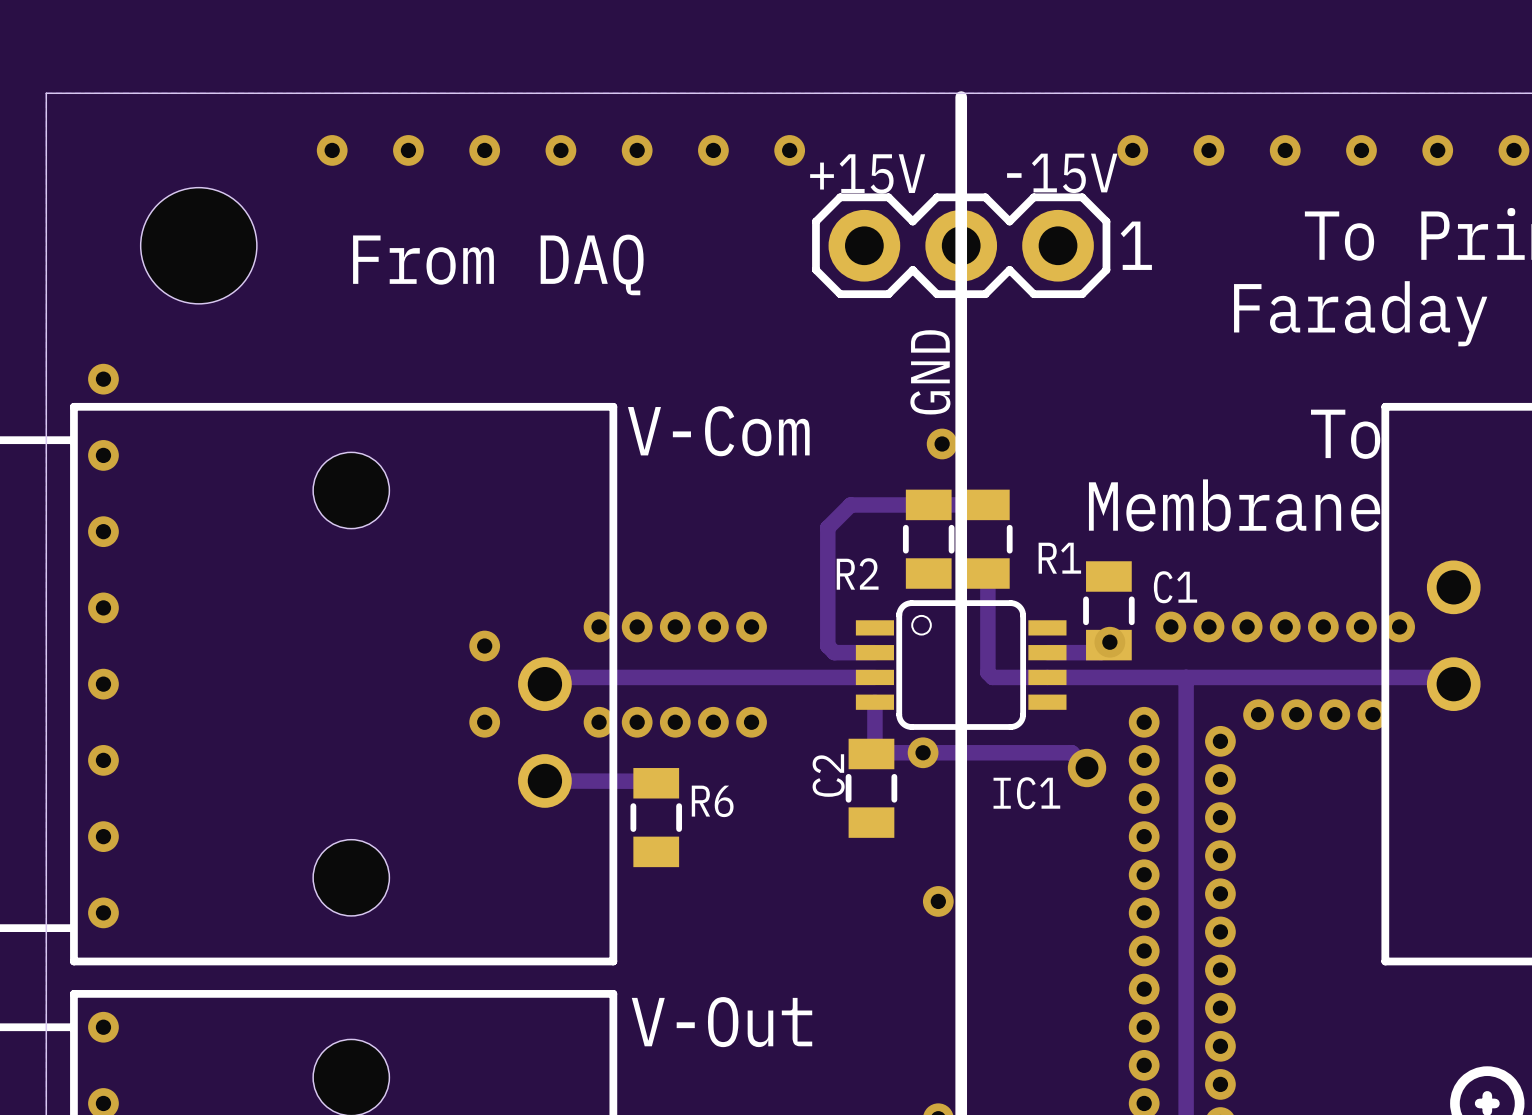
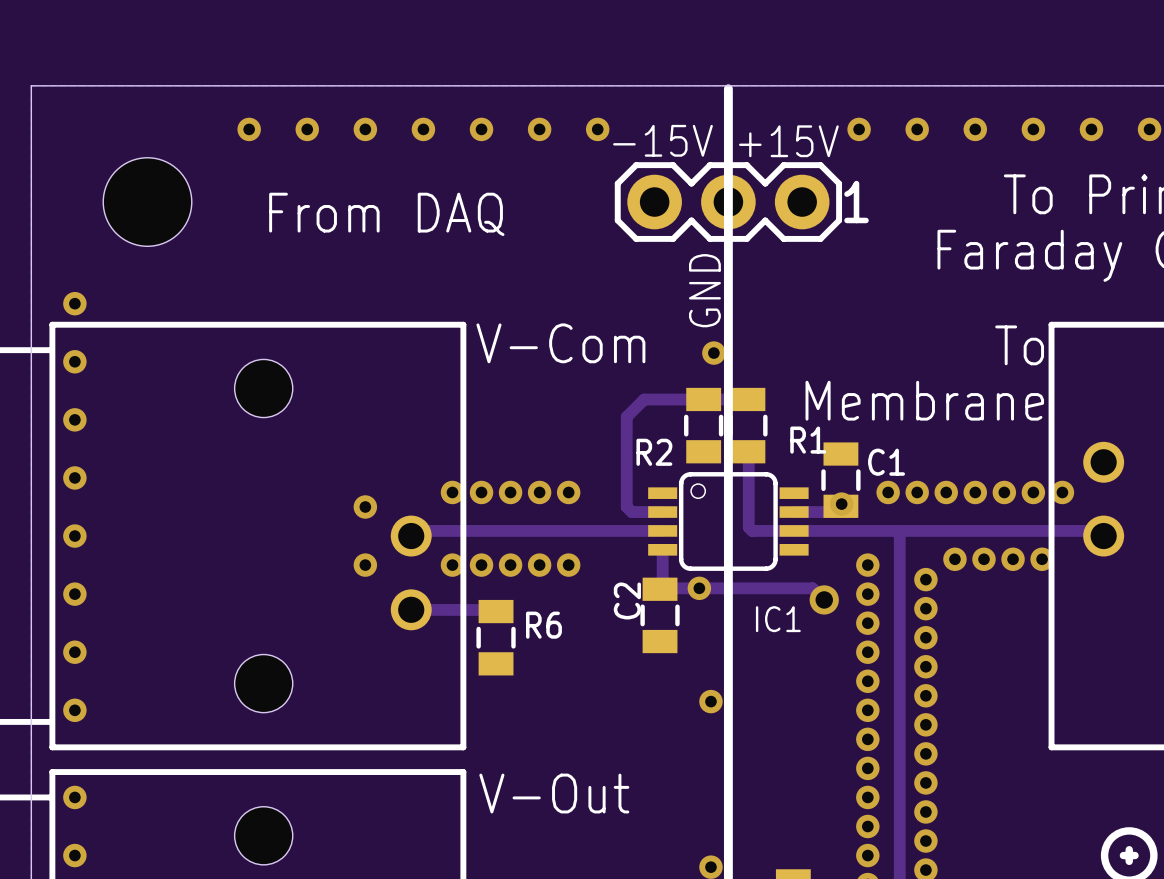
text position: +15V (867, 173) -> +15V (788, 141)
text position: -15V (1062, 173) -> -15V (662, 140)

